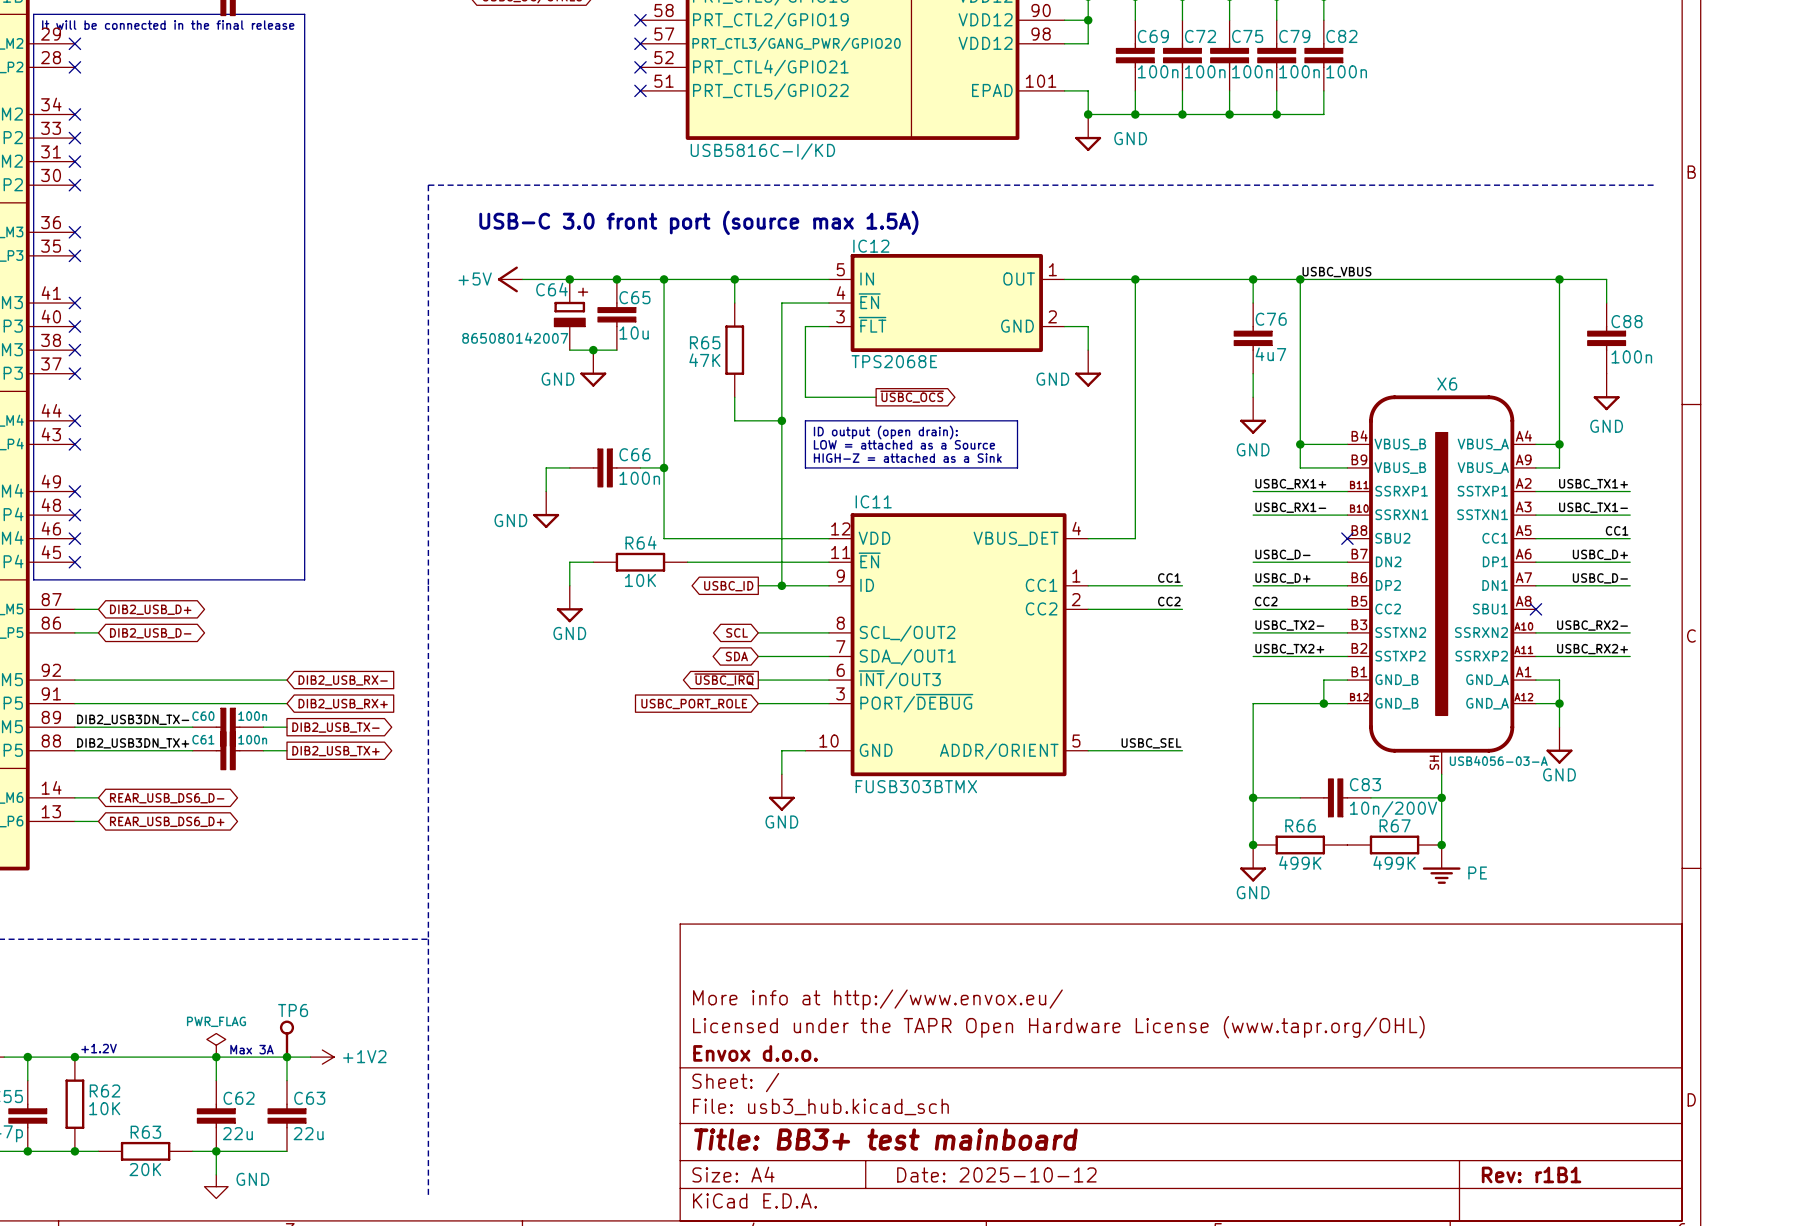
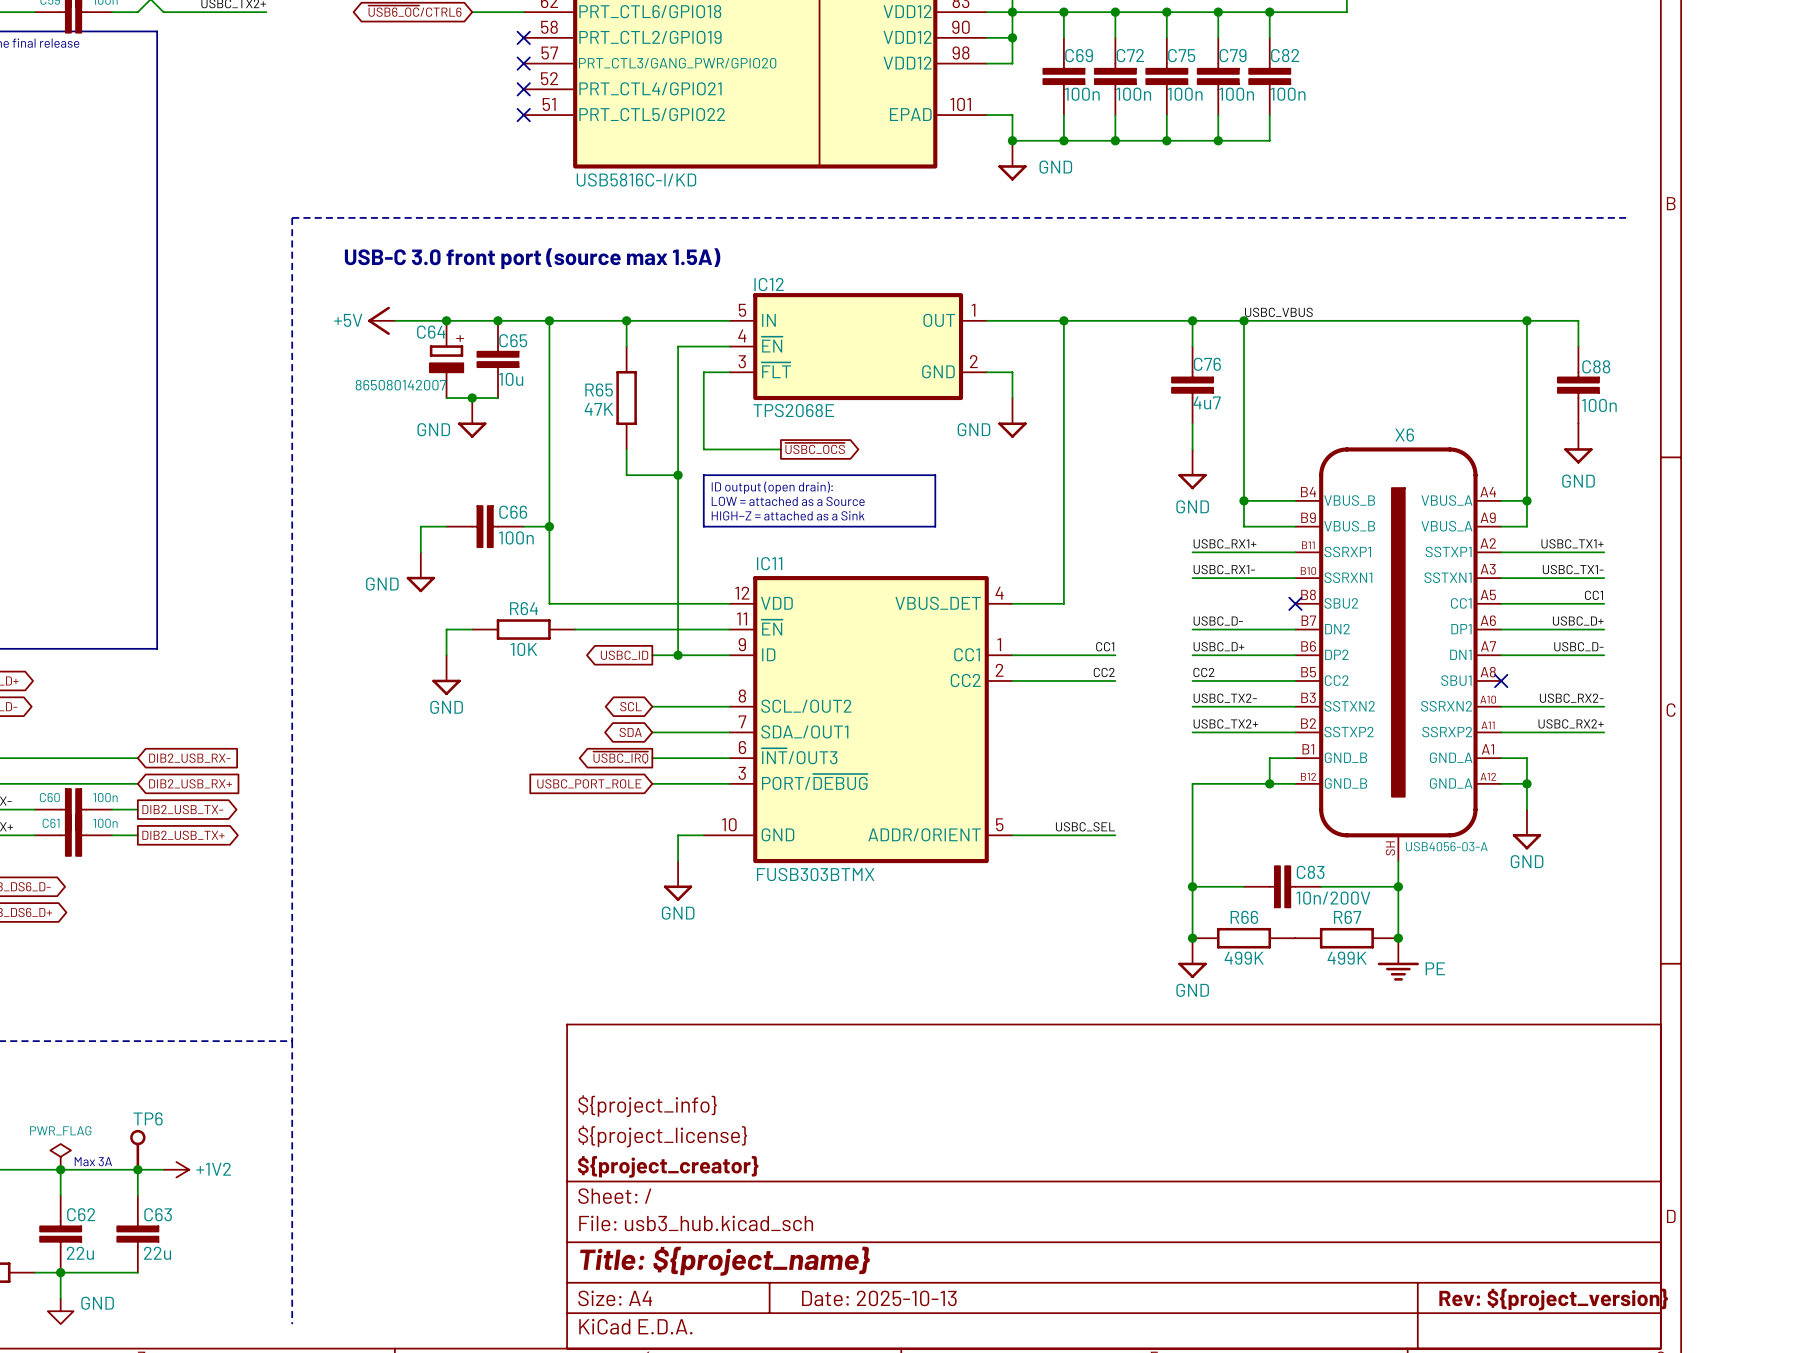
title block: More info at http://www.envox.eu/ (877, 999) -> ${project_info} (647, 1106)
title block: Licensed under the TAPR Open Hardware License (www.tapr.org/OHL) (1058, 1027) -> ${project_license} (662, 1136)
title block: Envox d.o.o. (755, 1053) -> ${project_creator} (668, 1166)
title block: Title: BB3+ test mainboard (885, 1139) -> Title: ${project_name} (725, 1261)
title block: Date: 2025-10-12 (996, 1174) -> Date: 2025-10-13 (879, 1298)
title block: Rev: r1B1 (1531, 1174) -> Rev: ${project_version} (1553, 1299)

